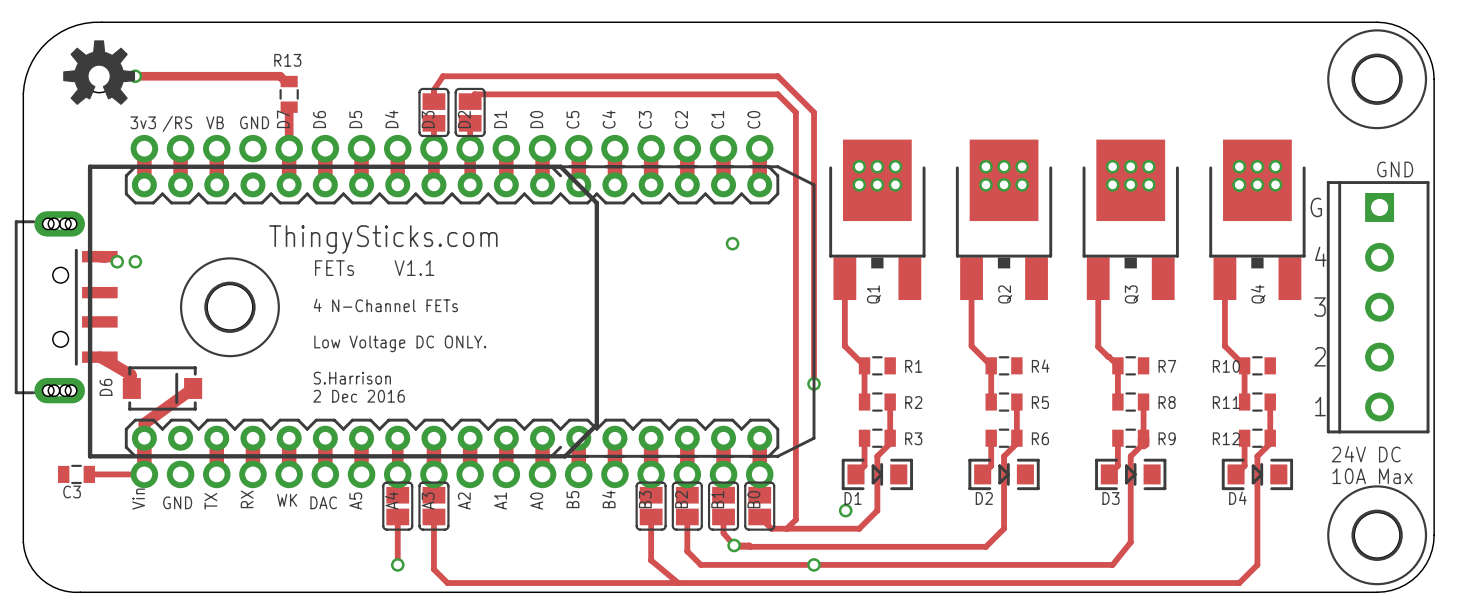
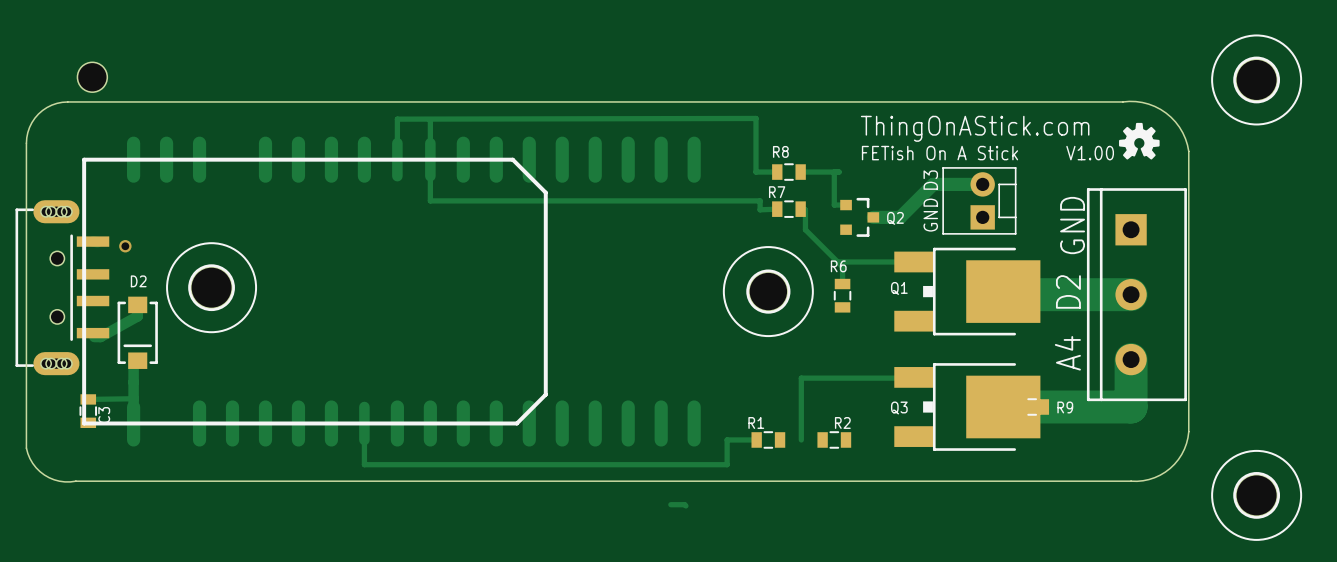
board edge: (101, 22) (1377, 22) (1398, 26) (1411, 34) (1426, 50) (1432, 64) (1434, 79) (1434, 535) (1429, 557) (1422, 569) (1405, 584) (1391, 590) (1377, 592) (73, 592) (59, 589) (47, 583) (36, 574) (28, 562) (23, 542) (23, 93) (25, 76) (32, 61) (47, 41) (61, 31) (76, 25) (101, 22) -> (67, 101) (51, 105) (38, 114) (29, 127) (26, 143) (26, 448) (36, 467) (54, 479) (64, 481) (1137, 481) (1154, 477) (1170, 468) (1181, 454) (1186, 443) (1188, 431) (1188, 151) (1185, 138) (1175, 122) (1160, 109) (1148, 104) (1129, 101) (67, 101)
drawing: [63, 40, 136, 105] -> none
track: (135, 76) (280, 76) (285, 81) (289, 81) -> none
via: (135, 76) -> none
R13: (289, 94) -> none
track: (433, 101) (433, 89) (443, 76) (777, 76) (814, 112) (814, 383) -> none
track: (470, 101) (474, 94) (777, 94) (795, 112) (795, 474) -> (756, 439) (727, 439)
track: (289, 107) (289, 148) -> none
part: (433, 112) -> none
part: (470, 112) -> none
track: none -> (397, 120) (755, 118) (755, 172) (777, 172)
drawing: none -> [1119, 122, 1160, 160]
text: none -> ThingOnAStick.com (975, 128)
Q2 footprint: [955, 139, 1053, 301] -> [840, 197, 880, 237]
text: none -> FETish On A Stick (940, 153)
text: none -> V1.00 (1090, 153)
via: (859, 166) -> none
via: (877, 166) -> none
via: (895, 166) -> none
via: (985, 166) -> none
via: (1004, 166) -> none
via: (1022, 166) -> none
via: (1112, 166) -> none
via: (1130, 166) -> none
via: (1148, 166) -> none
via: (1239, 166) -> none
via: (1257, 166) -> none
via: (1275, 166) -> none
text: GND (1395, 169) -> none
track: none -> (800, 172) (839, 172)
track: none -> (834, 172) (834, 205) (846, 205)
track: none -> (430, 176) (430, 200) (760, 200) (760, 209) (777, 209)
via: (859, 184) -> none
via: (877, 184) -> none
via: (895, 184) -> none
via: (985, 184) -> none
via: (1004, 184) -> none
via: (1022, 184) -> none
via: (1112, 184) -> none
via: (1130, 184) -> none
via: (1148, 184) -> none
via: (1239, 184) -> none
via: (1257, 184) -> none
via: (1275, 184) -> none
text: none -> D3 (930, 180)
track: none -> (982, 184) (933, 184) (900, 217) (873, 217)
text: G (1316, 207) -> none
part: none -> (979, 200)
Q1 rotation: 0° (877, 219) -> 90° clockwise (967, 291)
Q1 position: (877, 219) -> (967, 291)
Q3 rotation: 0° (1130, 219) -> 90° clockwise (967, 406)
Q3 position: (1130, 219) -> (967, 406)
Q4: (1257, 219) -> none
track: none -> (800, 209) (805, 209) (805, 229) (842, 266) (842, 284)
text: none -> GND (930, 215)
text: ThingySticks.com (383, 239) -> none
text: none -> GND (1072, 225)
via: (732, 243) -> none
text: 4 (1320, 256) -> none
via: (117, 261) -> none
text: FETs (334, 268) -> none
text: V1.1 (414, 268) -> none
track: (844, 278) (844, 346) (864, 365) (864, 402) -> none
track: (971, 278) (971, 346) (991, 365) (991, 402) -> none
track: (1098, 278) (1098, 346) (1117, 365) (1117, 402) -> none
track: (1224, 278) (1224, 346) (1244, 365) (1244, 402) -> none
track: none -> (837, 261) (913, 261)
Q2 name position: Q2 (1005, 294) -> Q2 (895, 218)
text: 4 N-Channel FETs (385, 305) -> none
text: 3 (1320, 307) -> none
part: (1378, 307) -> none
part: (452, 311) -> none
part: none -> (768, 291)
track: none -> (1003, 291) (1015, 291) (1015, 294) (1131, 294)
text: none -> D2 (1068, 291)
part: none -> (1136, 294)
track: none -> (137, 304) (137, 316) (100, 337) (94, 337)
text: Low Voltage DC ONLY. (400, 343) -> none
text: 2 (1320, 356) -> none
track: (99, 357) (130, 374) (131, 388) -> none
R1 position: (877, 365) -> (768, 439)
R4: (1004, 365) -> none
R7 position: (1130, 365) -> (788, 209)
R10: (1257, 365) -> none
R1 name position: R1 (913, 366) -> R1 (756, 422)
R7 name position: R7 (1167, 366) -> R7 (777, 192)
text: S.Harrison (352, 378) -> none
text: none -> A4 (1067, 353)
via: (814, 383) -> none
track: none -> (1131, 359) (1131, 406) (1003, 406)
D6: (162, 388) -> none
track: (193, 388) (144, 423) -> (137, 360) (133, 360) (133, 393)
text: 2 Dec 2016 (359, 396) -> none
R2 position: (877, 402) -> (834, 439)
track: (890, 402) (890, 443) (877, 456) -> (913, 377) (801, 378) (801, 423)
R2 name position: R2 (913, 402) -> R2 (842, 422)
R5: (1004, 402) -> none
track: (1016, 402) (1016, 443) (1004, 456) (1004, 528) (985, 546) (735, 546) (723, 533) (723, 516) -> none
R8 position: (1130, 402) -> (788, 172)
track: (1143, 402) (1143, 443) (1130, 456) (1130, 542) (1112, 564) (700, 564) (687, 551) (687, 516) -> none
R8 name position: R8 (1167, 402) -> R8 (780, 151)
R11: (1257, 402) -> none
track: (1270, 402) (1270, 443) (1257, 456) (1257, 564) (1239, 583) (447, 583) (433, 569) (433, 516) -> none
text: 1 (1320, 406) -> none
track: none -> (133, 398) (88, 399)
track: (864, 438) (864, 465) (855, 474) -> none
R3: (877, 438) -> none
track: (991, 438) (991, 465) (982, 474) -> none
R6 rotation: 0° (1004, 438) -> 90° clockwise (842, 295)
R6 position: (1004, 438) -> (842, 295)
R6 name position: R6 (1040, 438) -> R6 (838, 266)
track: (1117, 438) (1117, 465) (1109, 474) -> none
track: (1244, 438) (1244, 465) (1236, 474) -> none
R12: (1257, 438) -> none
text: 24V DC (1366, 454) -> none
D2 footprint: [968, 458, 1040, 491] -> [117, 296, 158, 369]
C3 rotation: 0° (76, 474) -> 90° clockwise (88, 411)
C3 position: (76, 474) -> (88, 411)
track: (89, 474) (144, 474) -> none
track: (877, 474) (877, 510) (859, 528) (771, 528) (759, 516) -> none
D1: (877, 474) -> none
D3: (1130, 474) -> none
D4: (1257, 474) -> none
text: 10A Max (1372, 476) -> none
D2 name position: D2 (984, 498) -> D2 (138, 281)
track: (795, 501) (795, 519) (786, 528) -> (727, 464) (364, 464) (364, 458)
part: (397, 506) -> none
part: (433, 506) -> none
part: (651, 506) -> none
part: (687, 506) -> none
part: (723, 506) -> none
part: (759, 506) -> none
via: (845, 510) -> none
track: (397, 516) (397, 564) -> none
track: (651, 516) (651, 560) (678, 583) -> none
via: (734, 545) -> none
via: (397, 564) -> none
via: (814, 564) -> none

